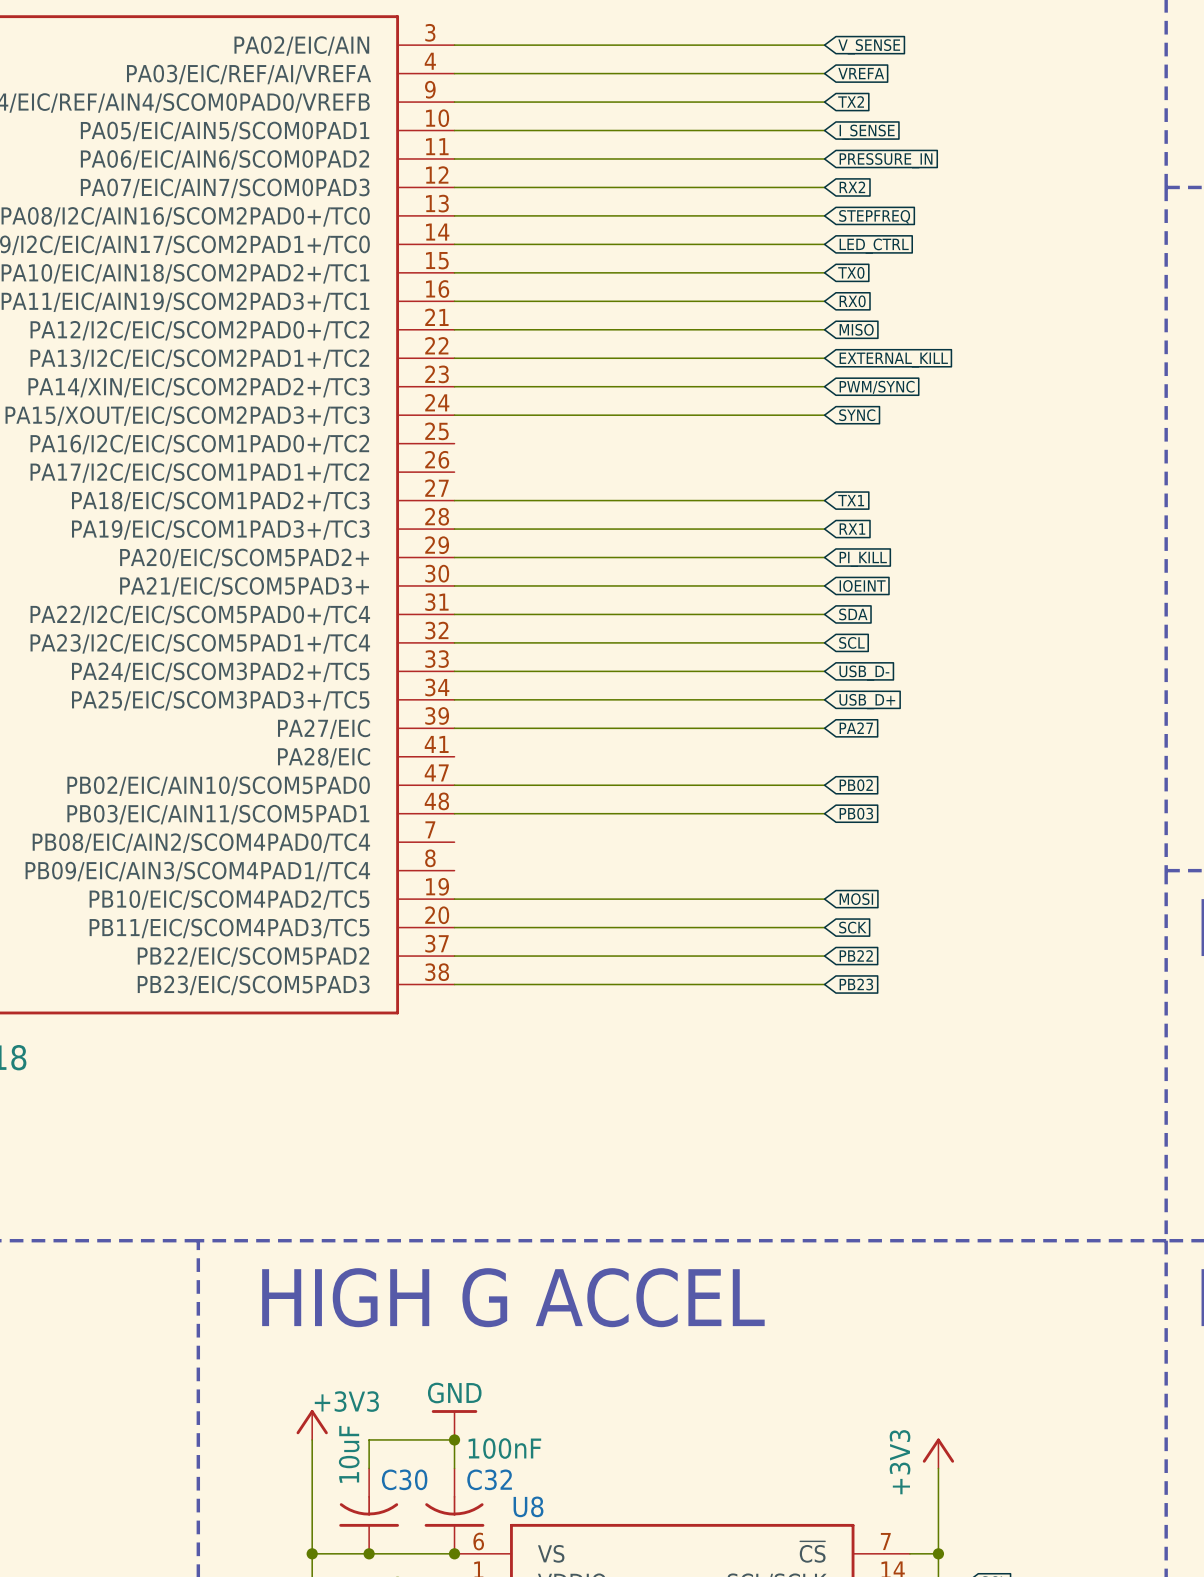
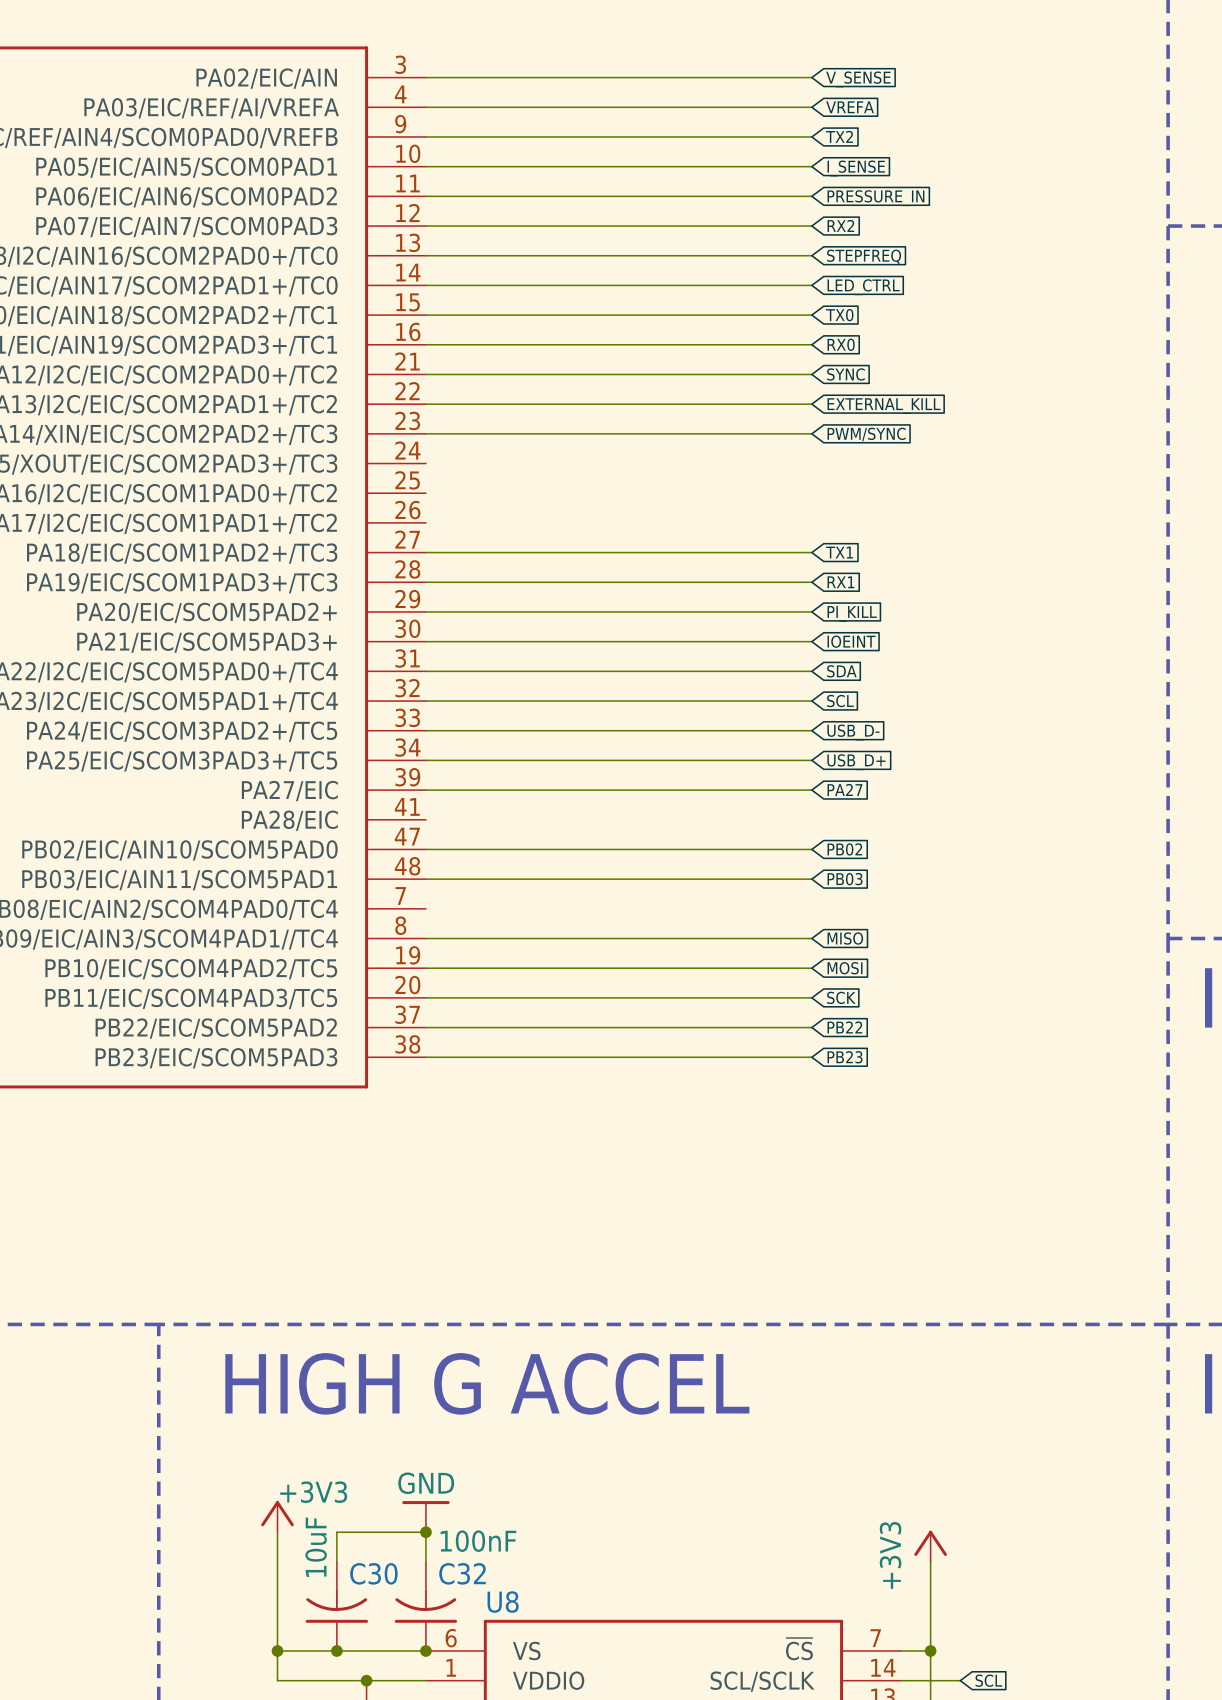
global label: MISO (856, 329) -> SYNC (845, 374)
wire: (454, 415) (824, 415) -> none
global label: SYNC (857, 415) -> none
wire: none -> (425, 938) (811, 938)
global label: none -> MISO (845, 938)

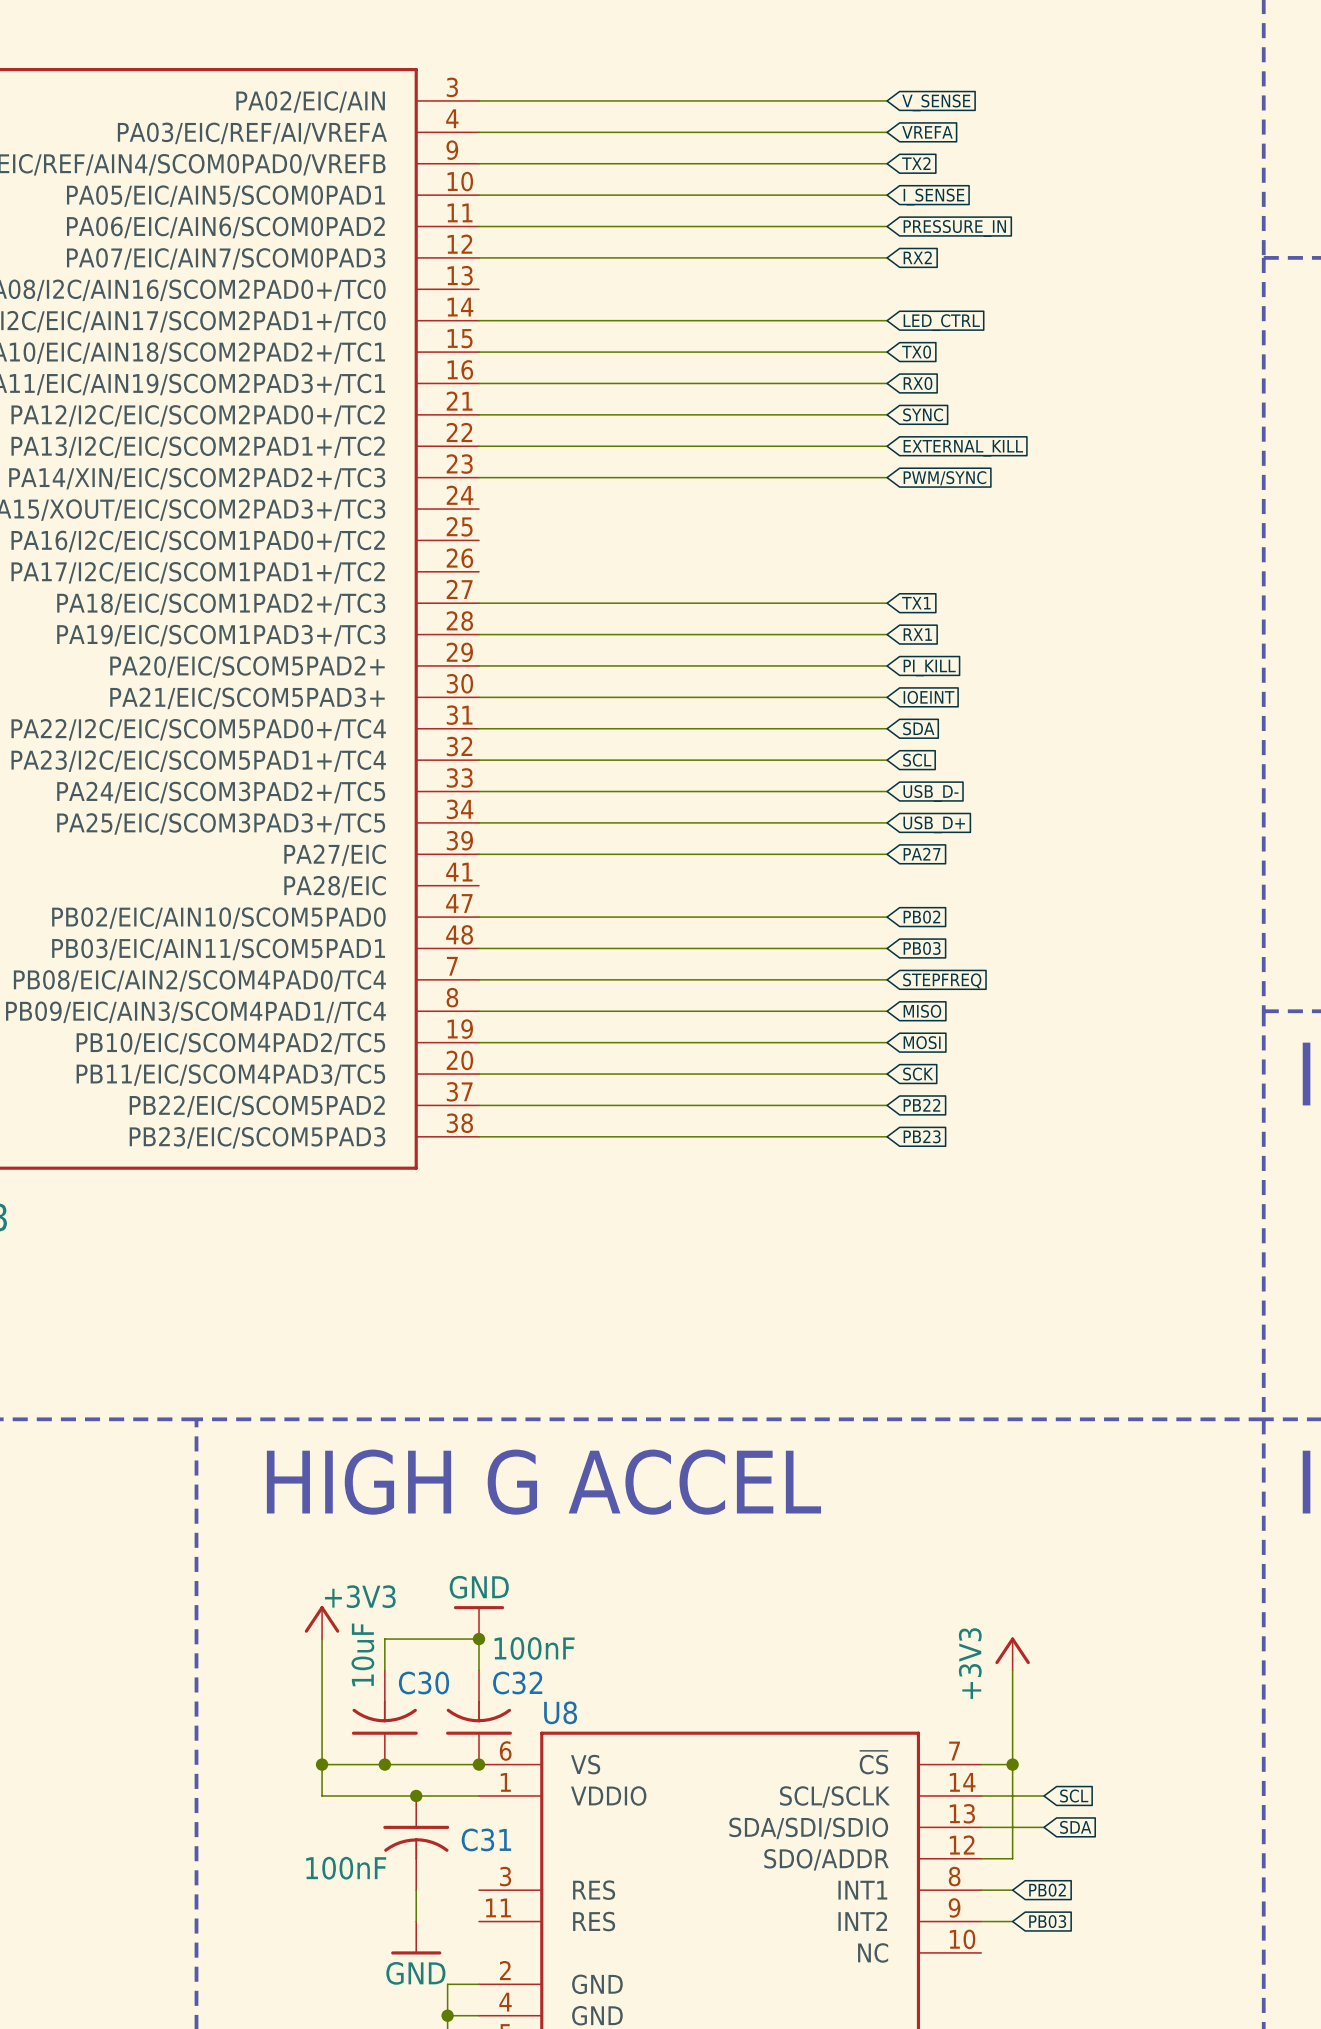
wire: (425, 255) (811, 255) -> none
global label: STEPFREQ (864, 256) -> none
wire: none -> (479, 979) (887, 979)
global label: none -> STEPFREQ (942, 980)

